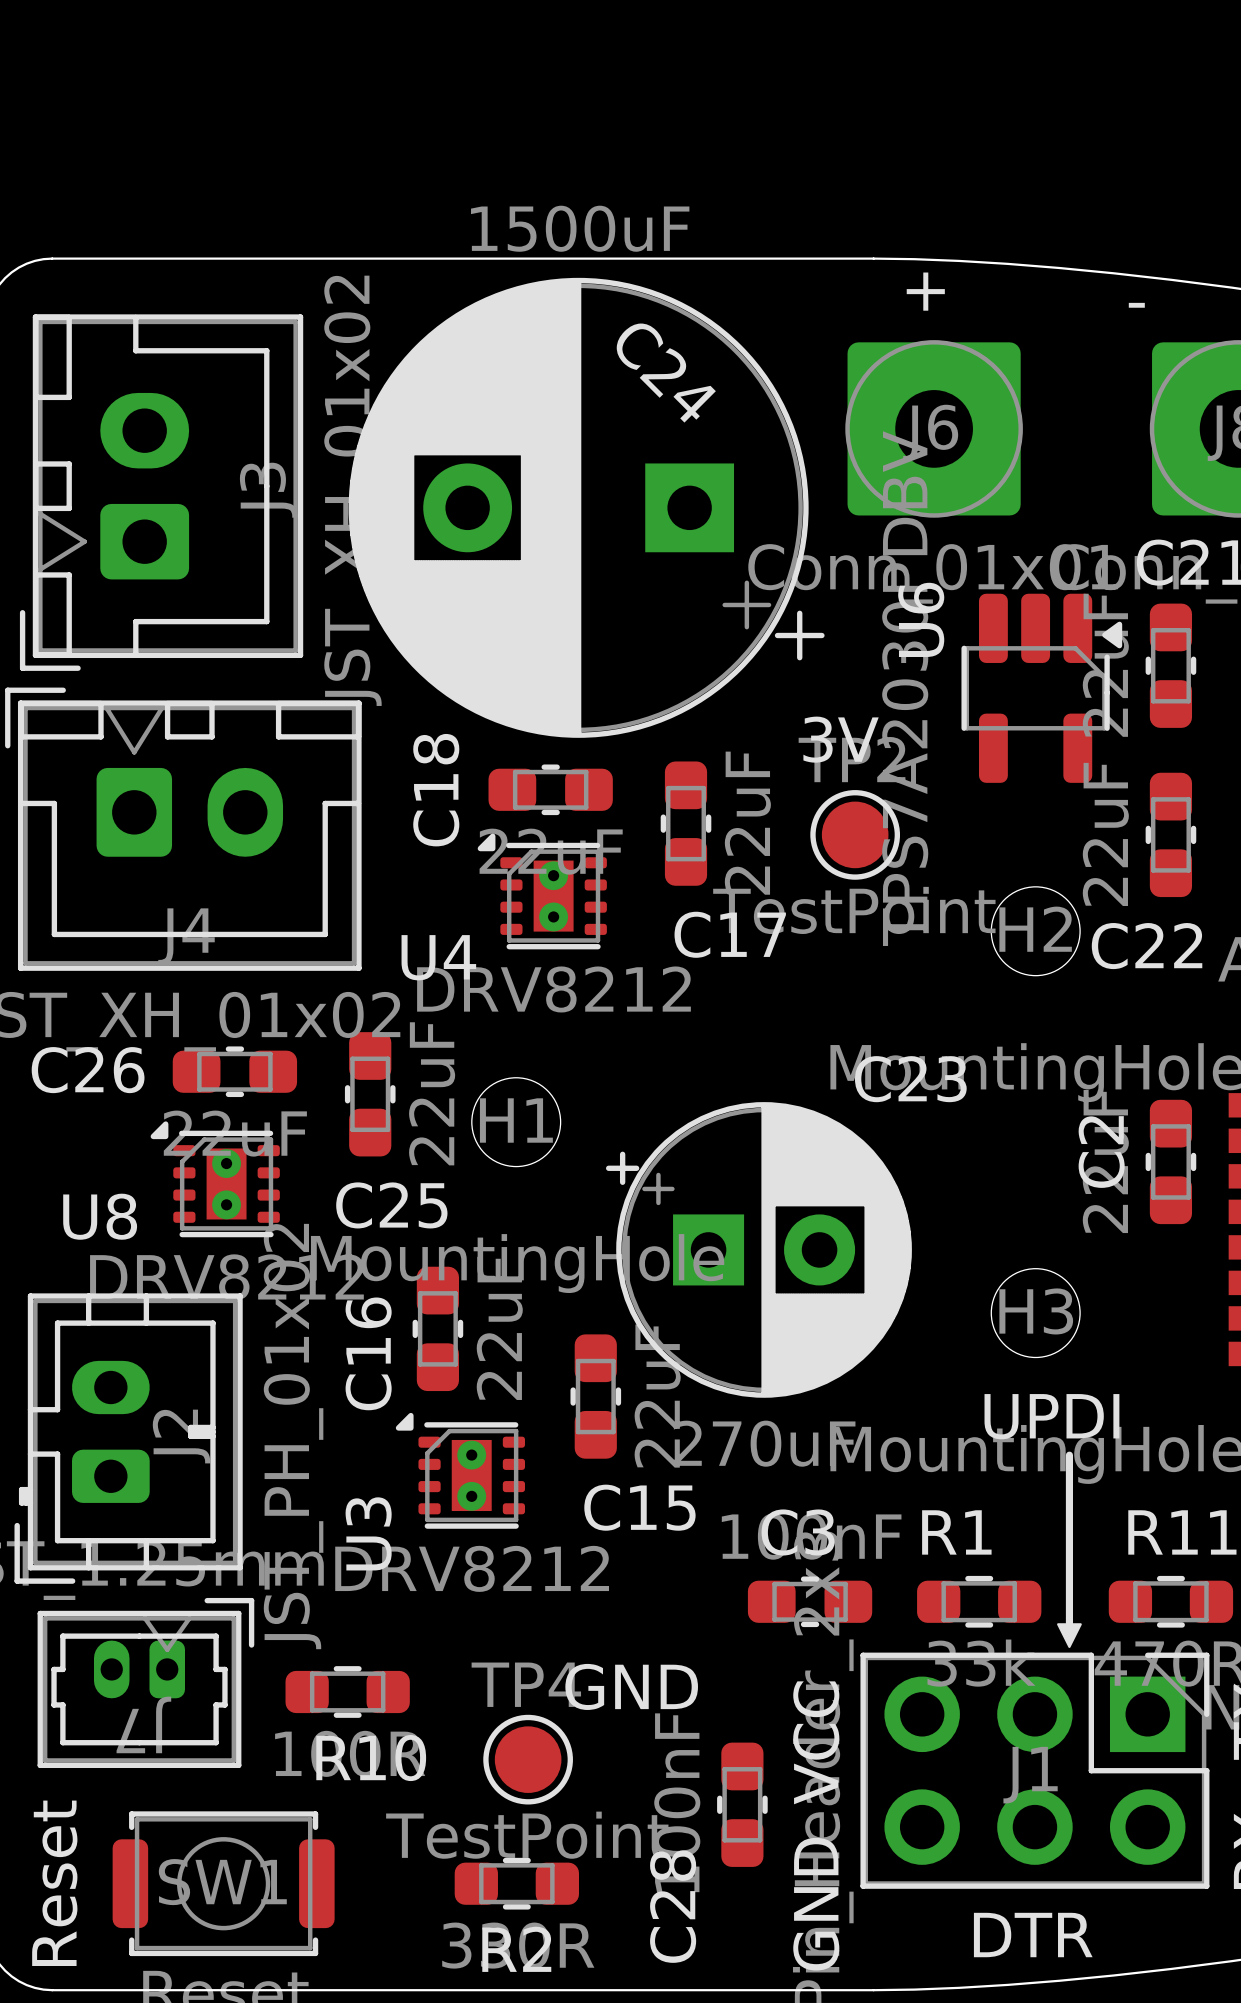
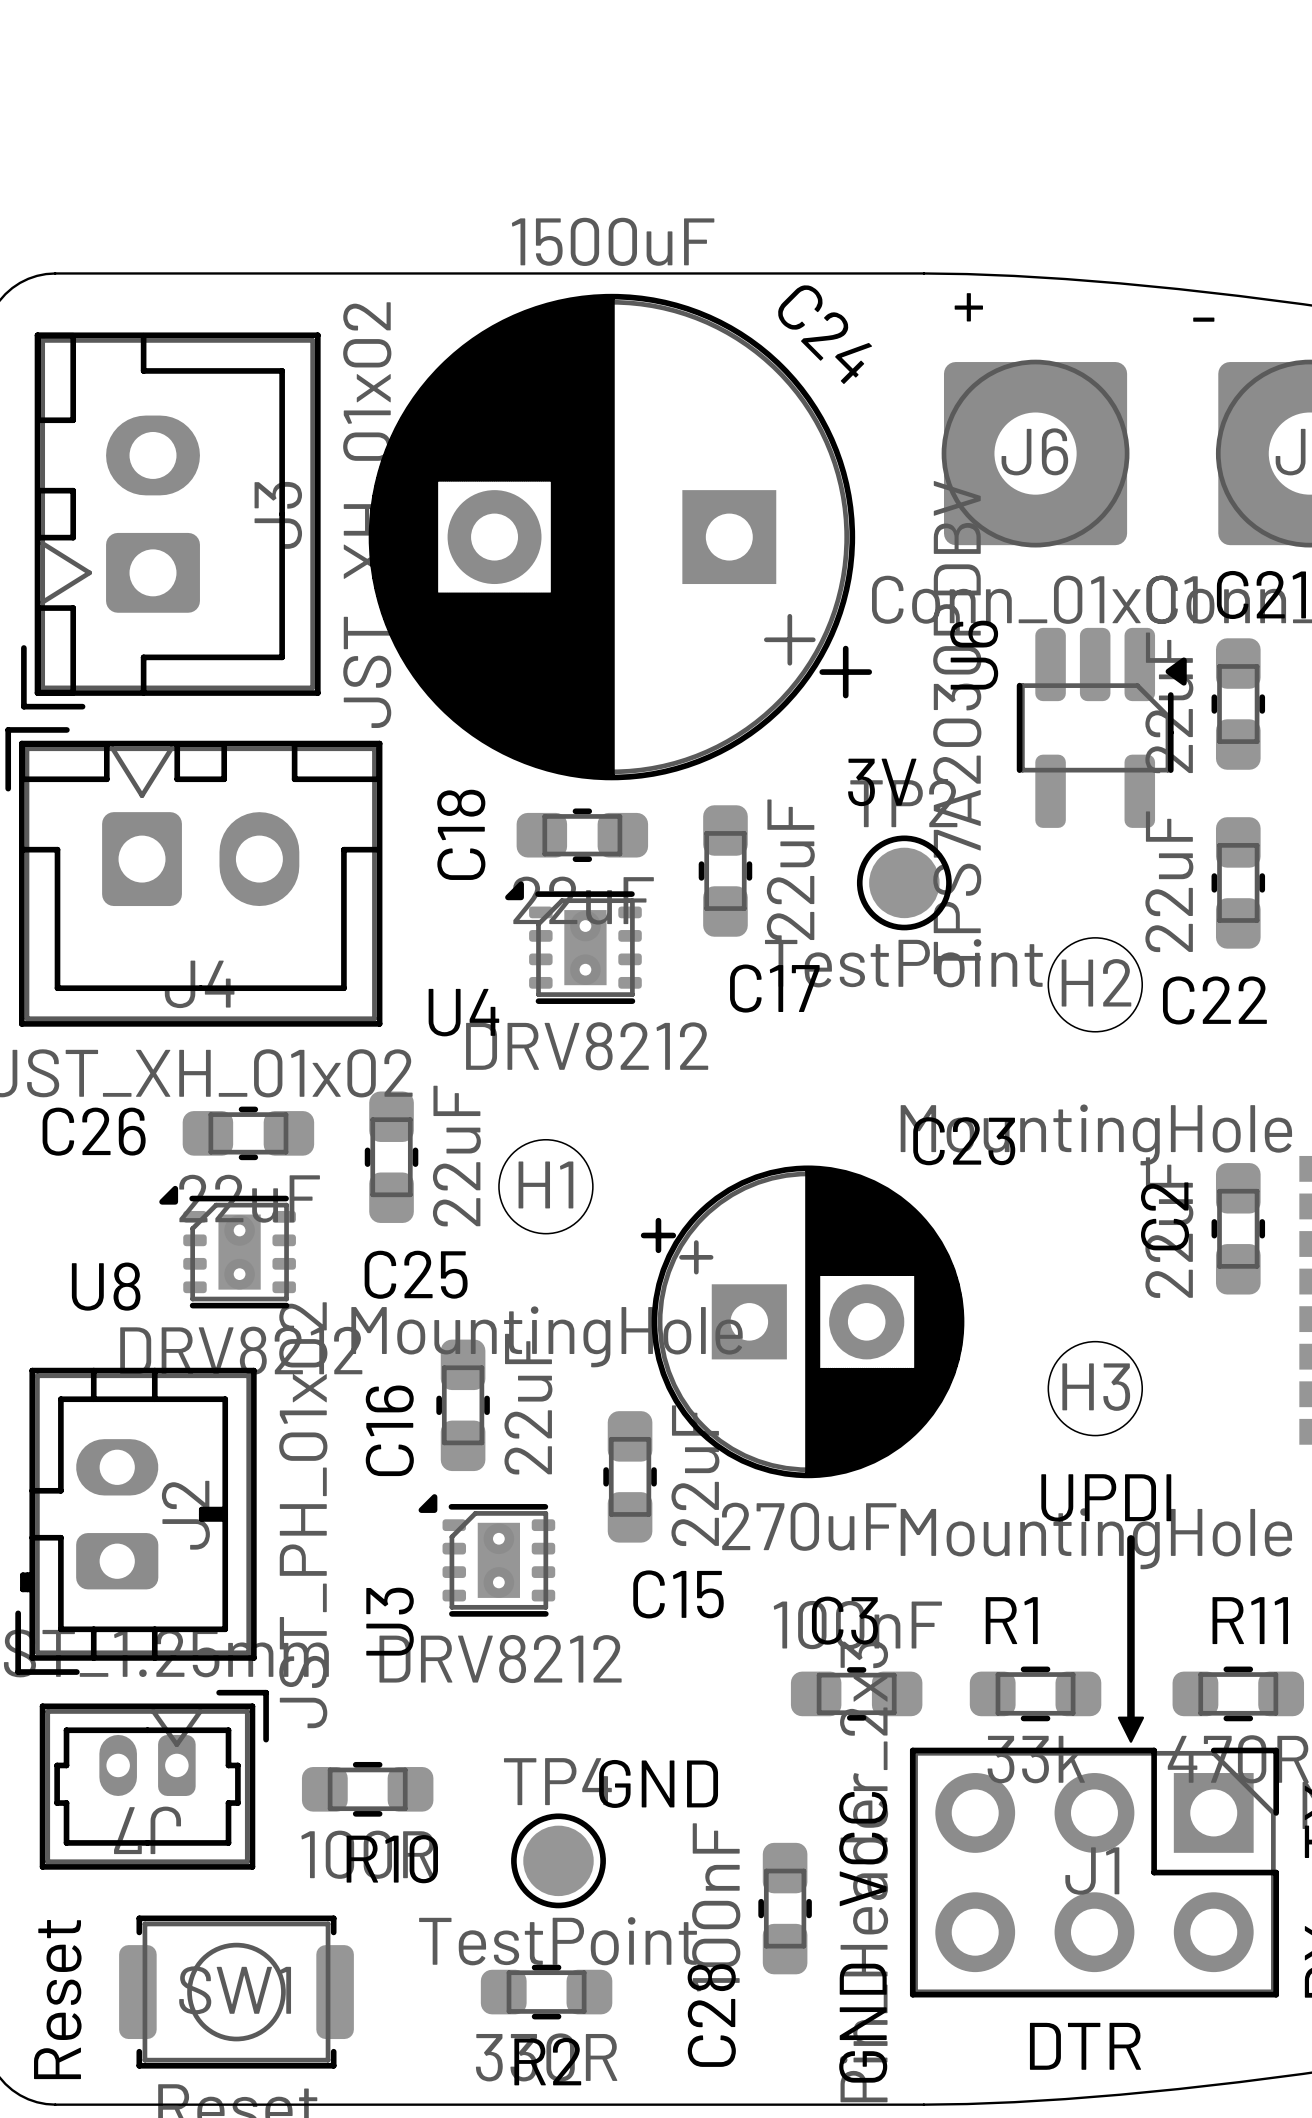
C24 name position: C24 (666, 372) -> C24 (824, 334)
J6 position: (934, 428) -> (1035, 453)

